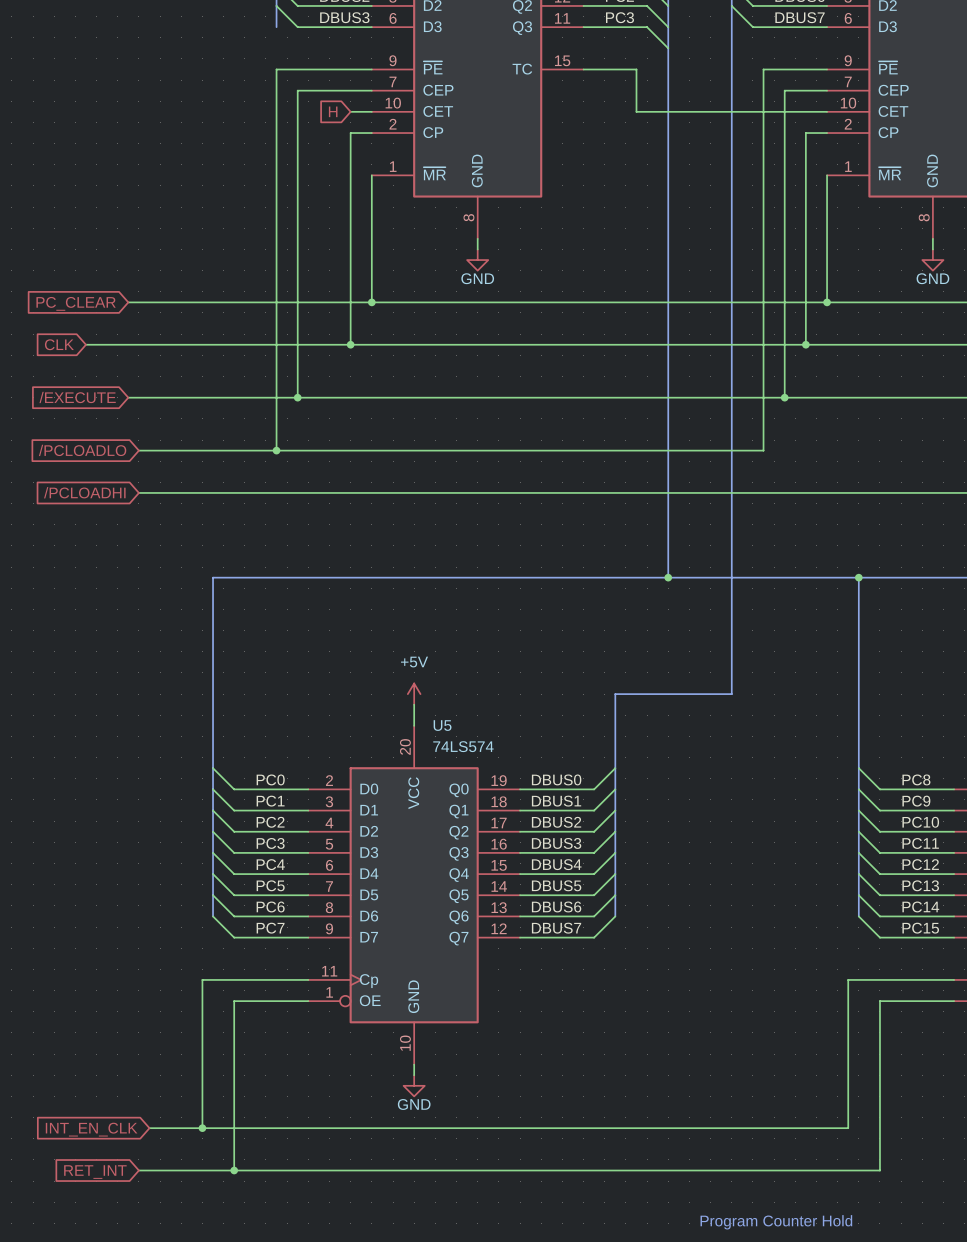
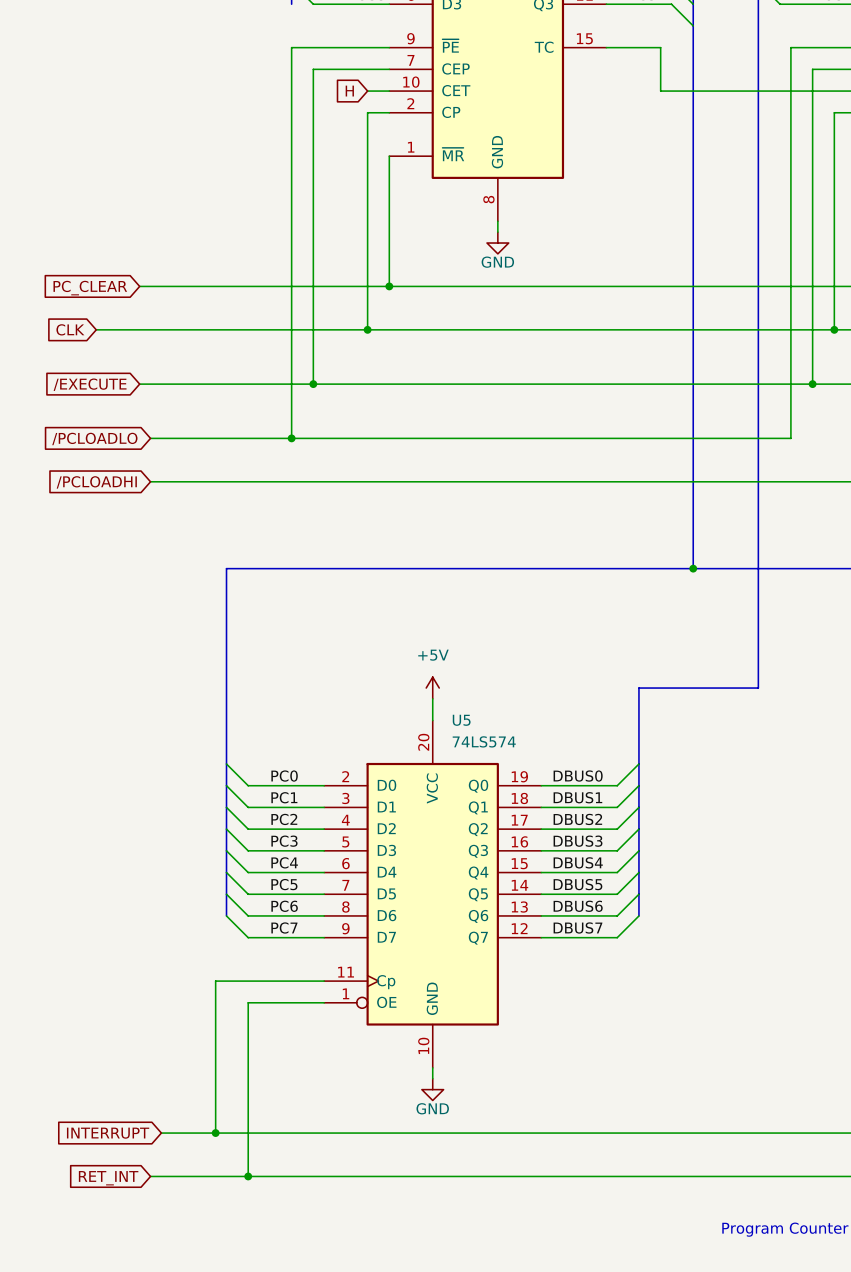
global label: INT_EN_CLK (91, 1129) -> INTERRUPT (108, 1133)

